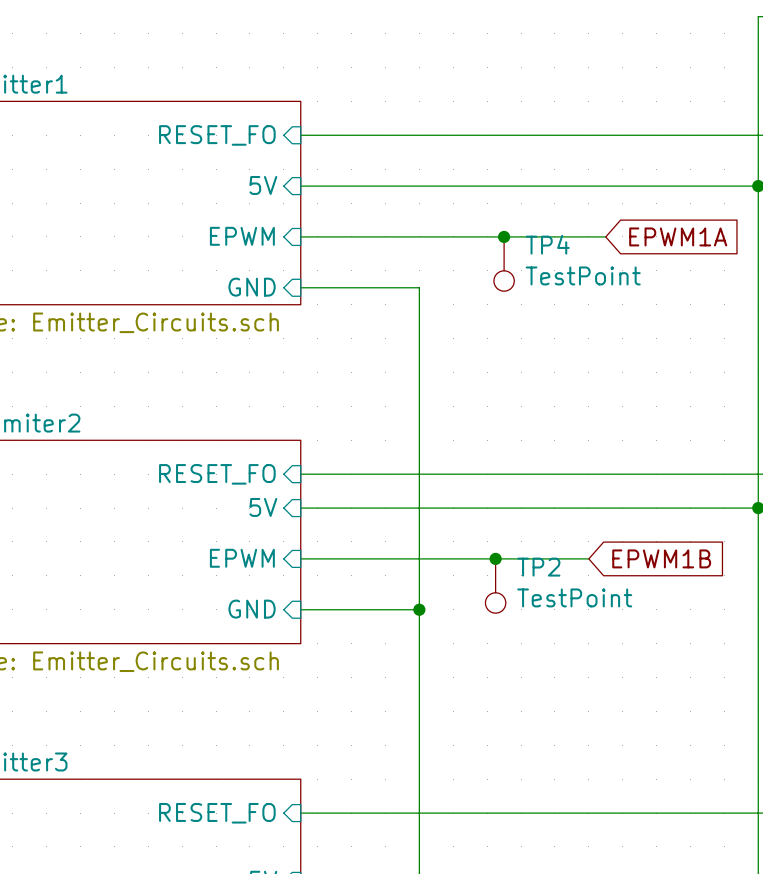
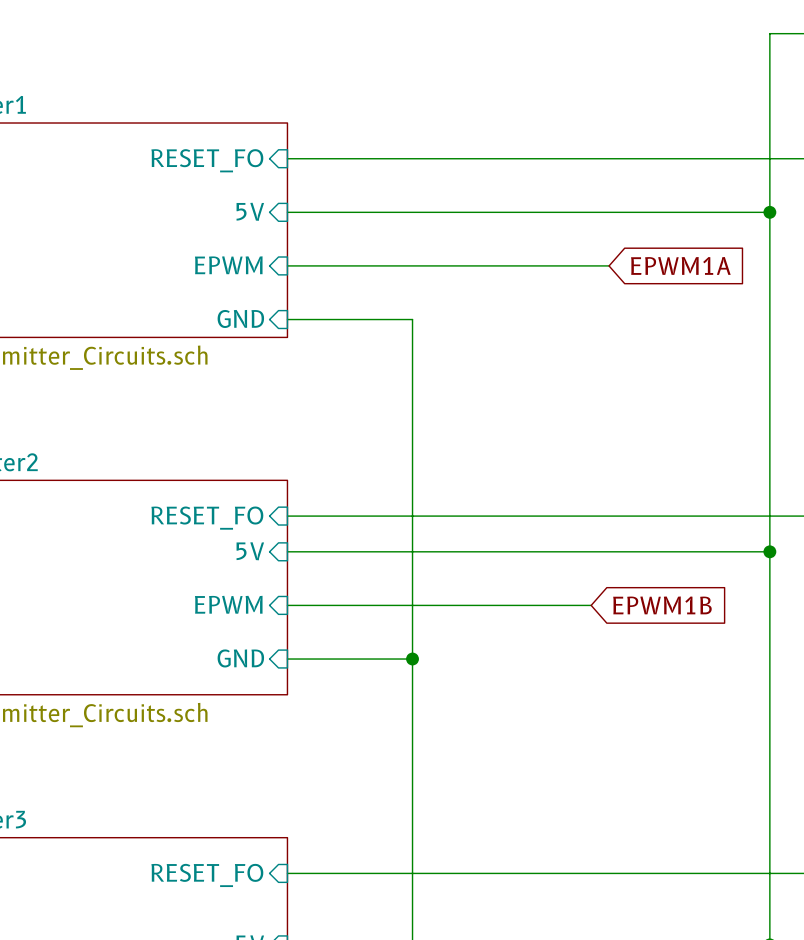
junction: (504, 236) -> none
TP4: TestPoint (504, 264) -> none
junction: (495, 558) -> none
TP2: TestPoint (495, 586) -> none

